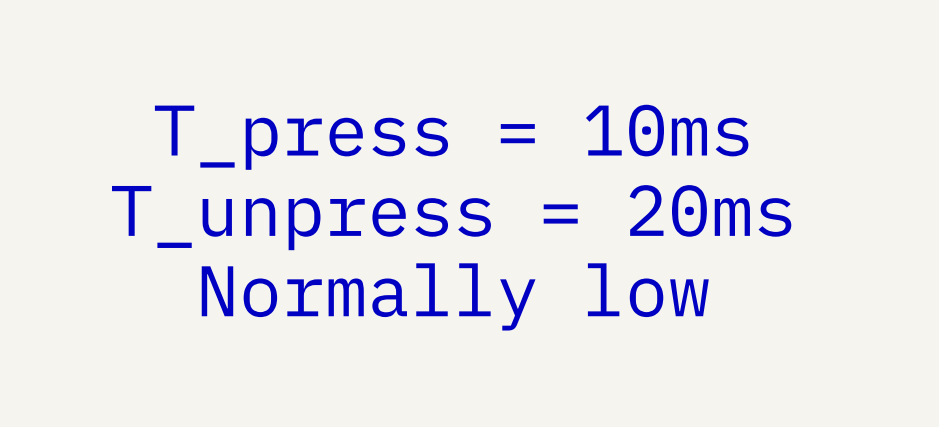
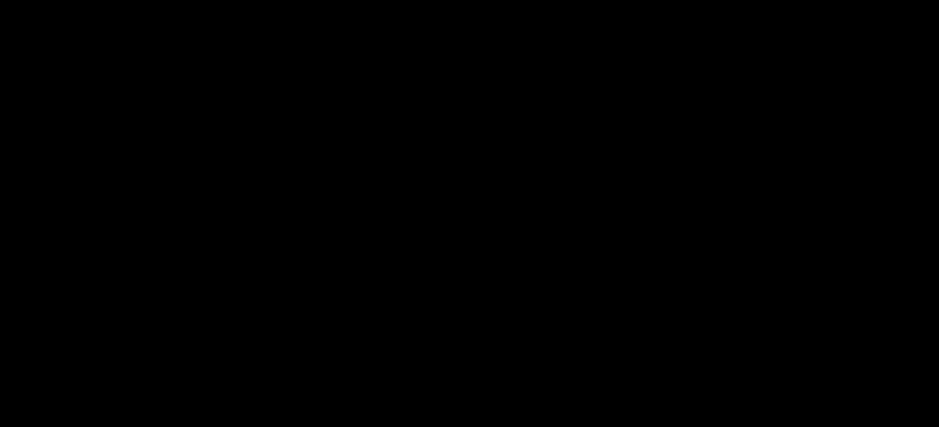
text: T_press = 10ms (451, 137) -> none
text: T_unpress = 20ms (451, 217) -> none
text: Normally low (455, 296) -> none

